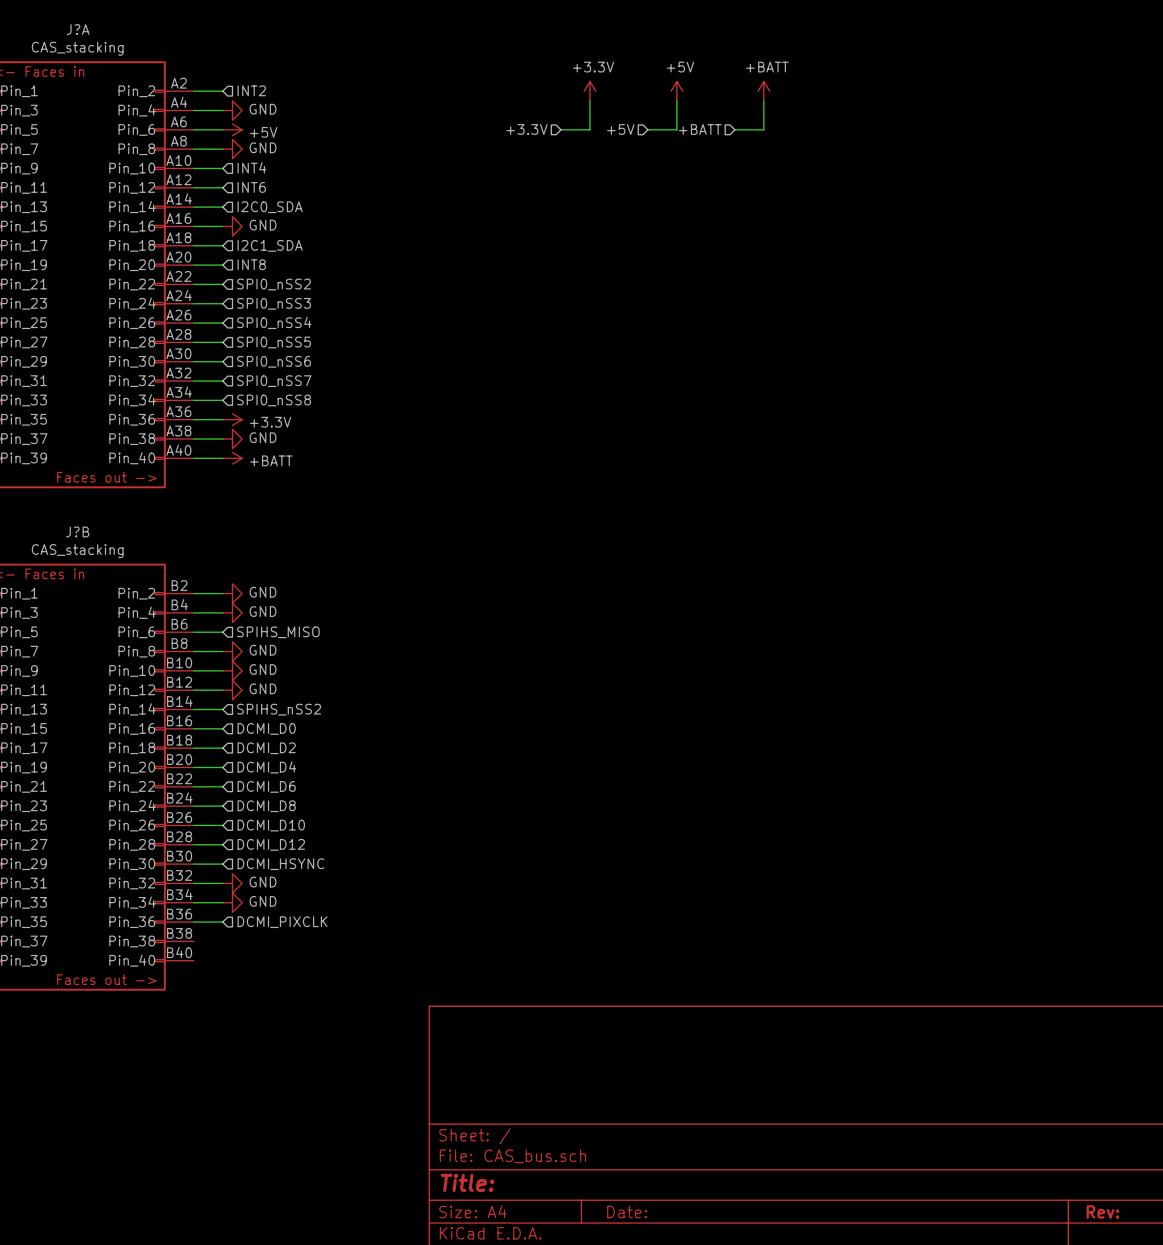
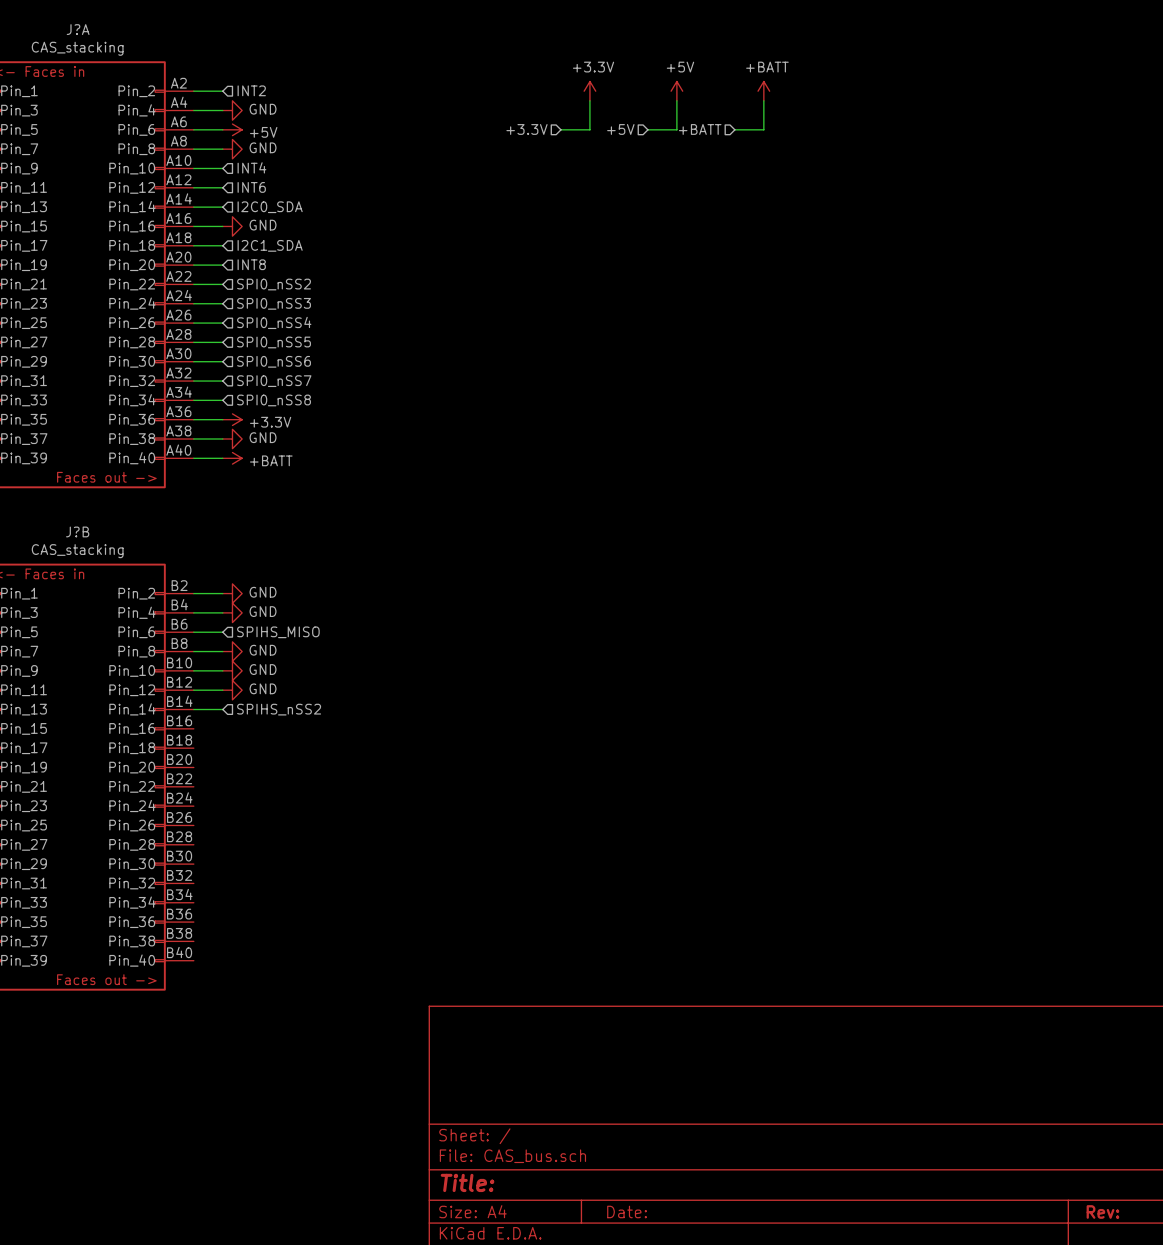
wire: (193, 728) (222, 728) -> none
hierarchical label: DCMI_D0 (266, 728) -> none
wire: (193, 748) (222, 748) -> none
hierarchical label: DCMI_D2 (266, 748) -> none
wire: (193, 767) (222, 767) -> none
hierarchical label: DCMI_D4 (266, 767) -> none
wire: (193, 786) (222, 786) -> none
hierarchical label: DCMI_D6 (266, 786) -> none
wire: (193, 806) (222, 806) -> none
hierarchical label: DCMI_D8 (266, 806) -> none
wire: (193, 825) (222, 825) -> none
hierarchical label: DCMI_D10 (271, 825) -> none
wire: (193, 844) (222, 844) -> none
hierarchical label: DCMI_D12 (271, 844) -> none
wire: (193, 864) (222, 864) -> none
hierarchical label: DCMI_HSYNC (280, 864) -> none
wire: (193, 883) (222, 883) -> none
power symbol: GND (232, 883) -> none
wire: (193, 902) (222, 902) -> none
power symbol: GND (232, 902) -> none
wire: (193, 922) (222, 922) -> none
hierarchical label: DCMI_PIXCLK (282, 922) -> none

